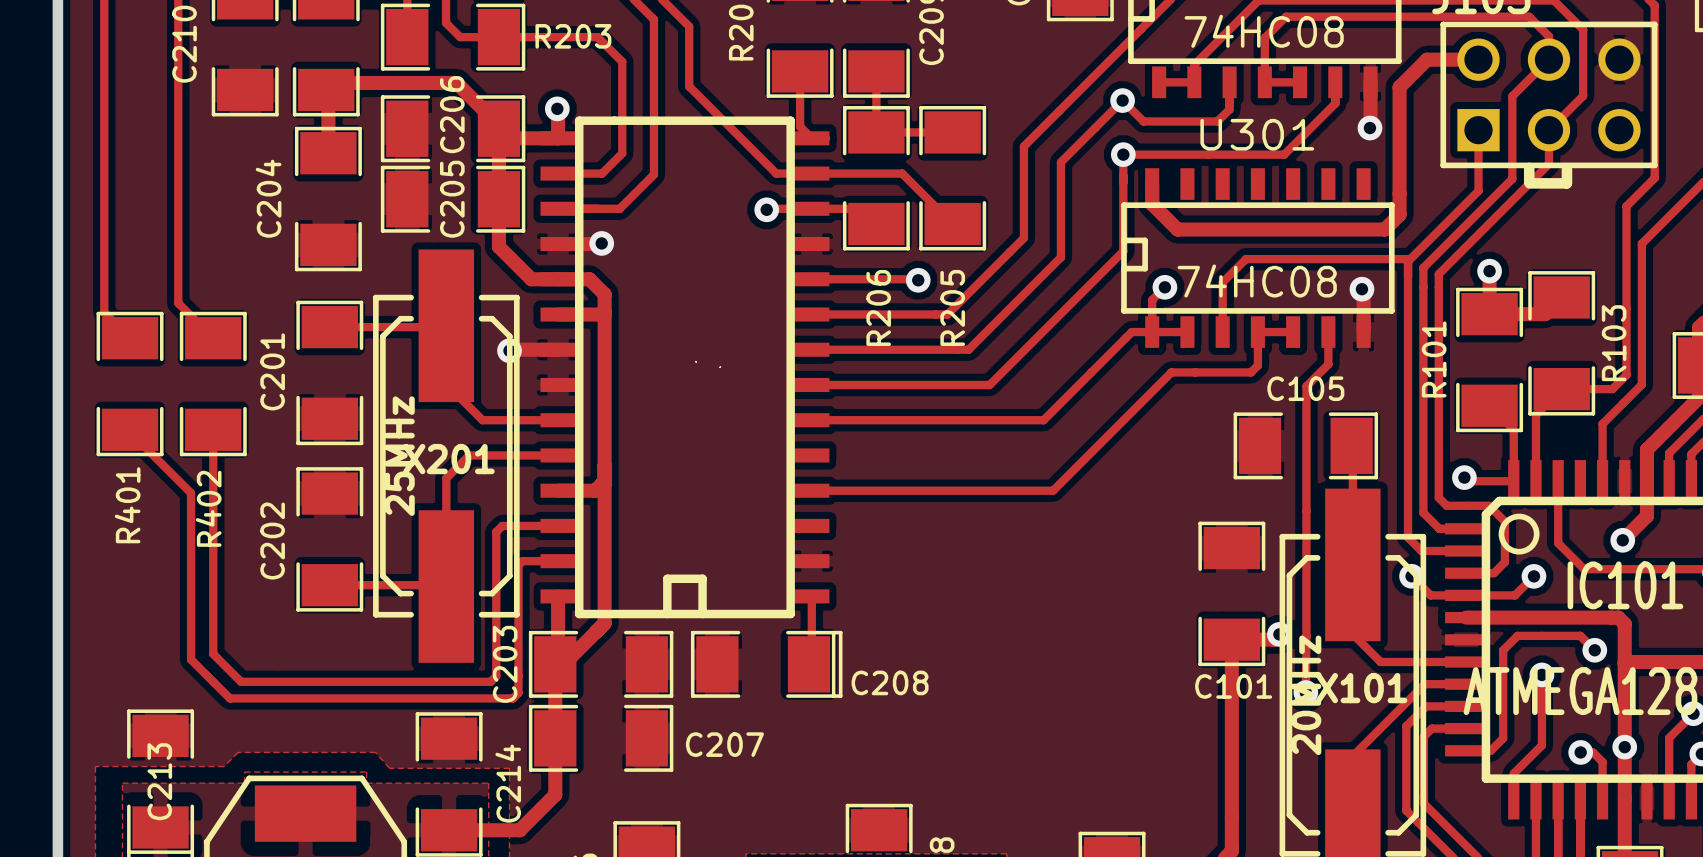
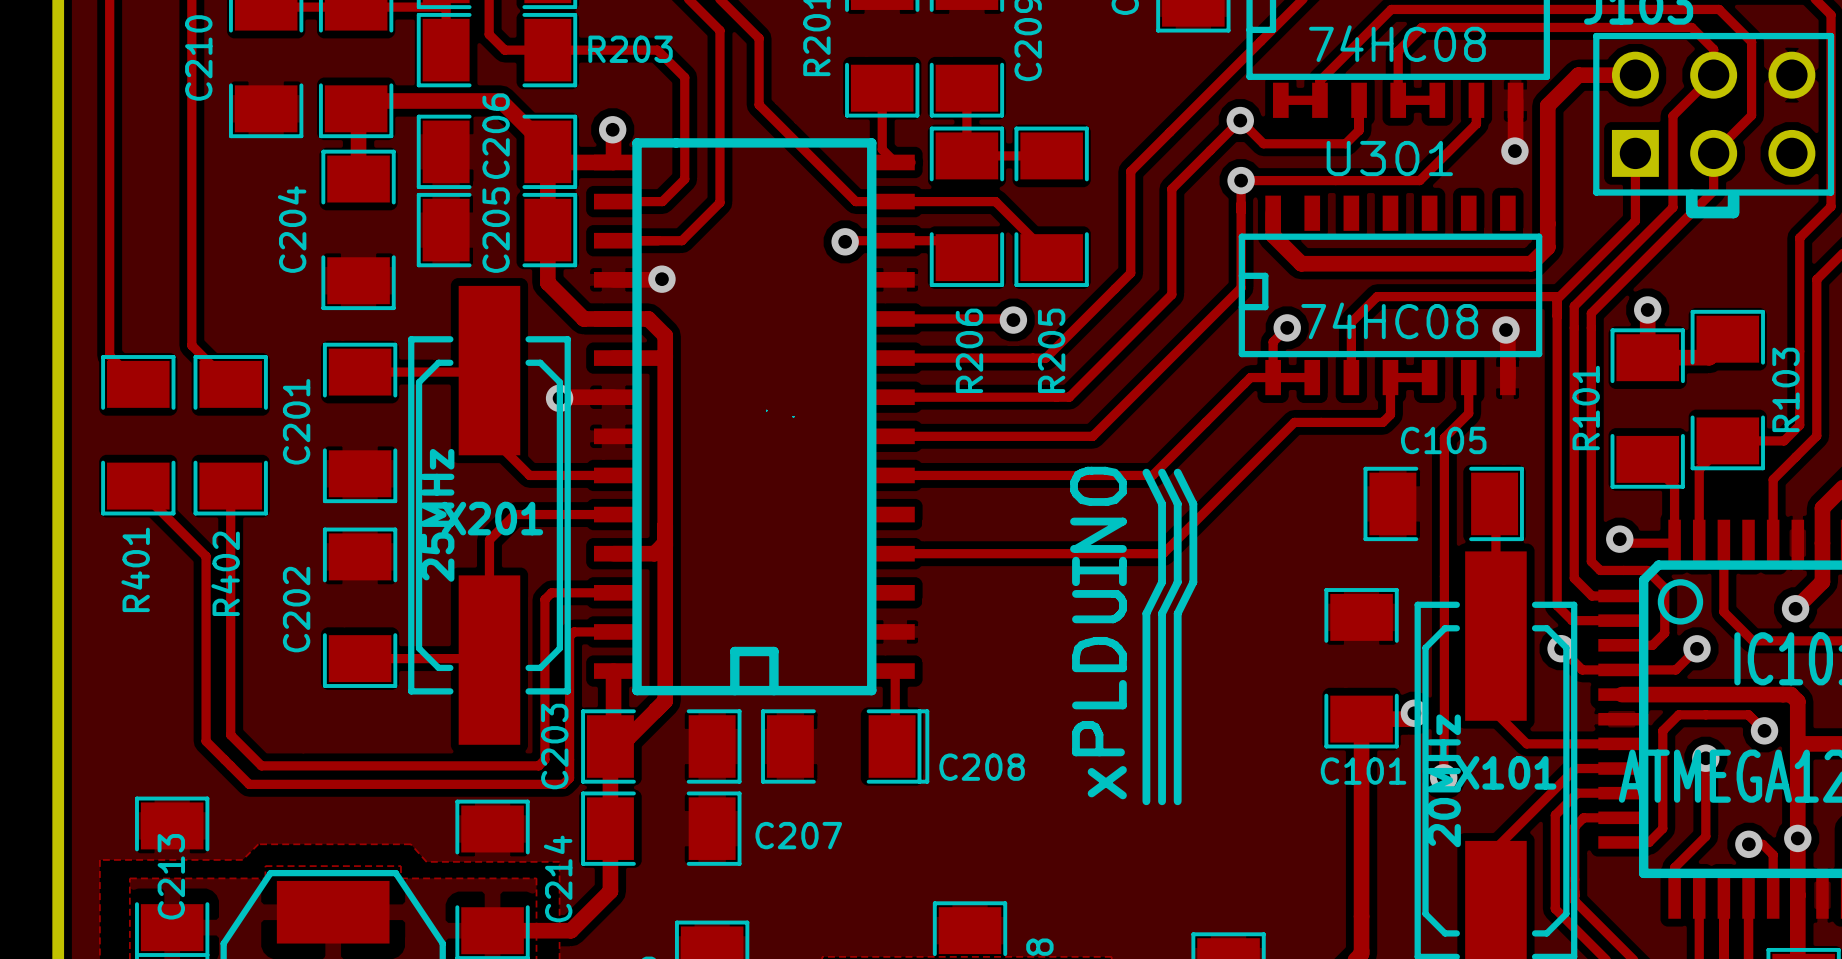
drawing: none -> [1070, 466, 1198, 806]

